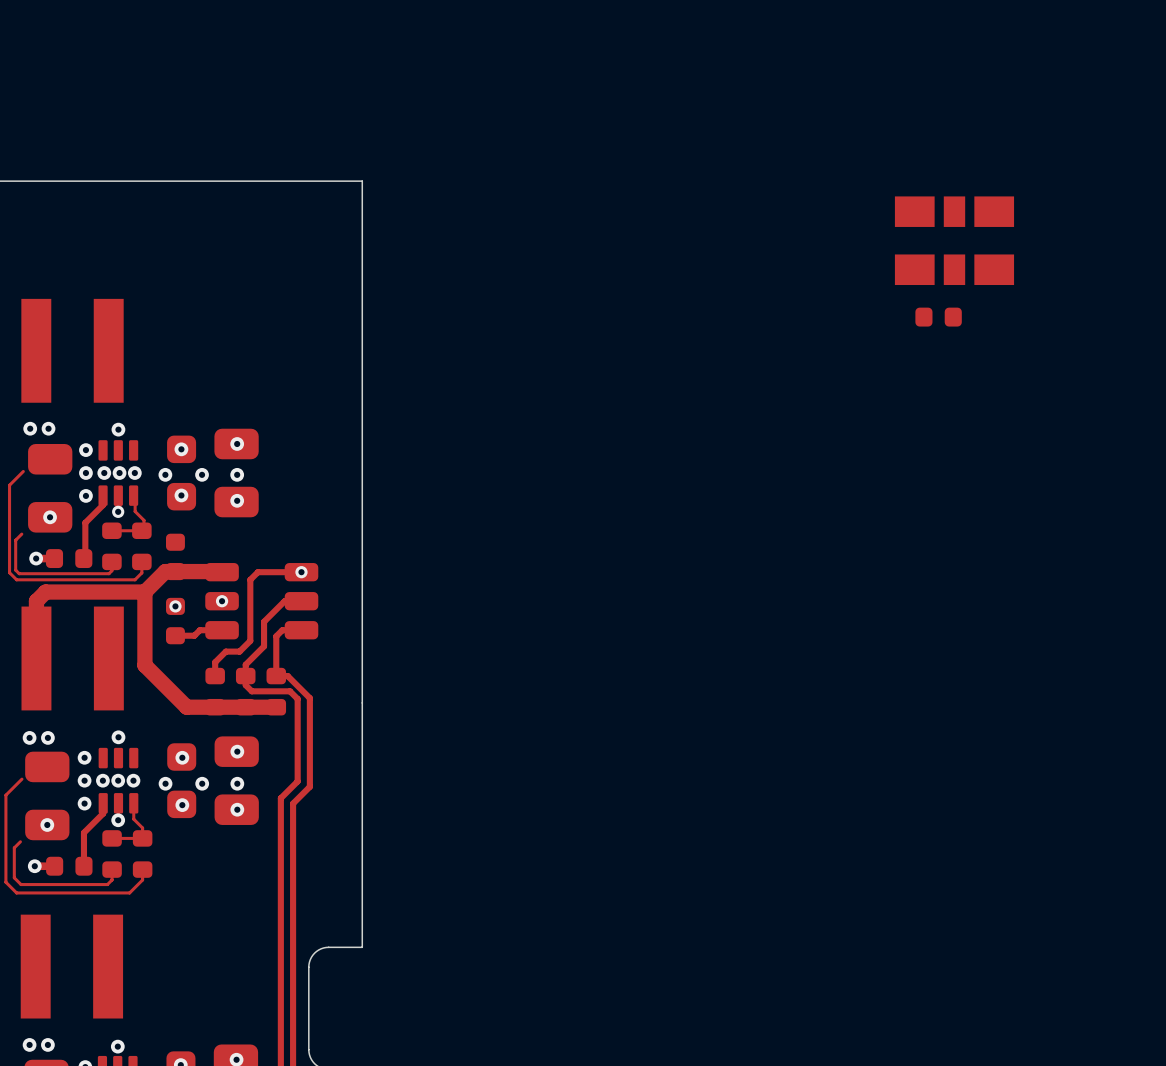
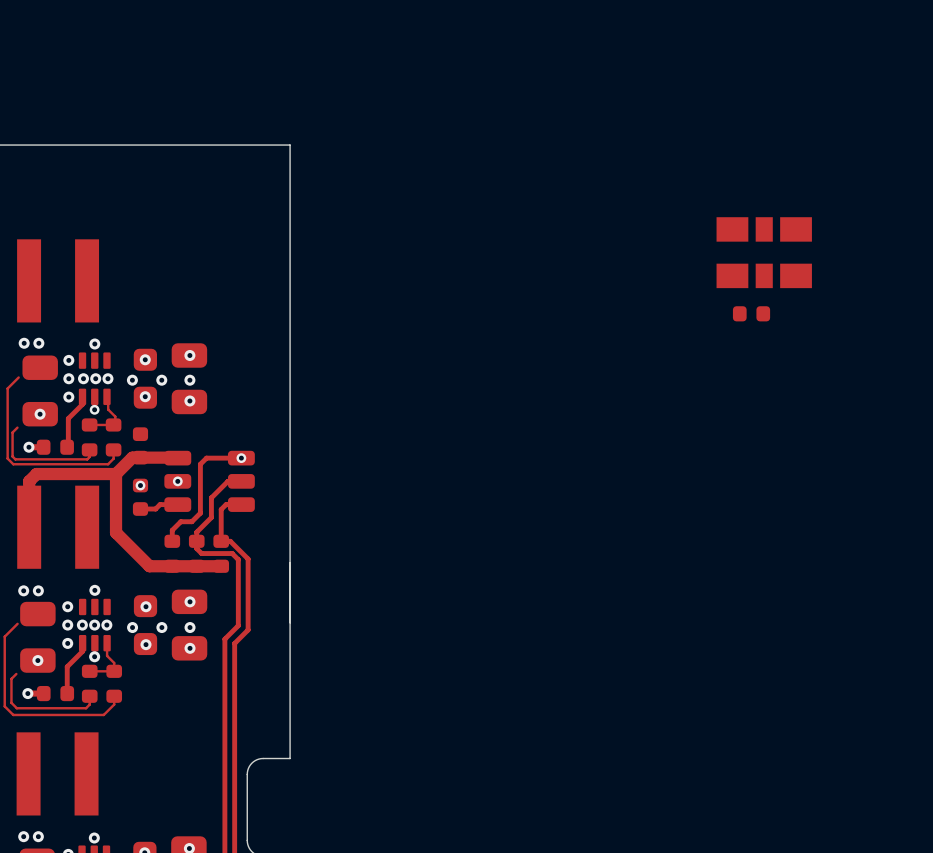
part: (954, 240) -> none
part footprint: [915, 307, 962, 327] -> [716, 217, 812, 289]
part: none -> (751, 313)
board edge: none -> (290, 562) (290, 622)

